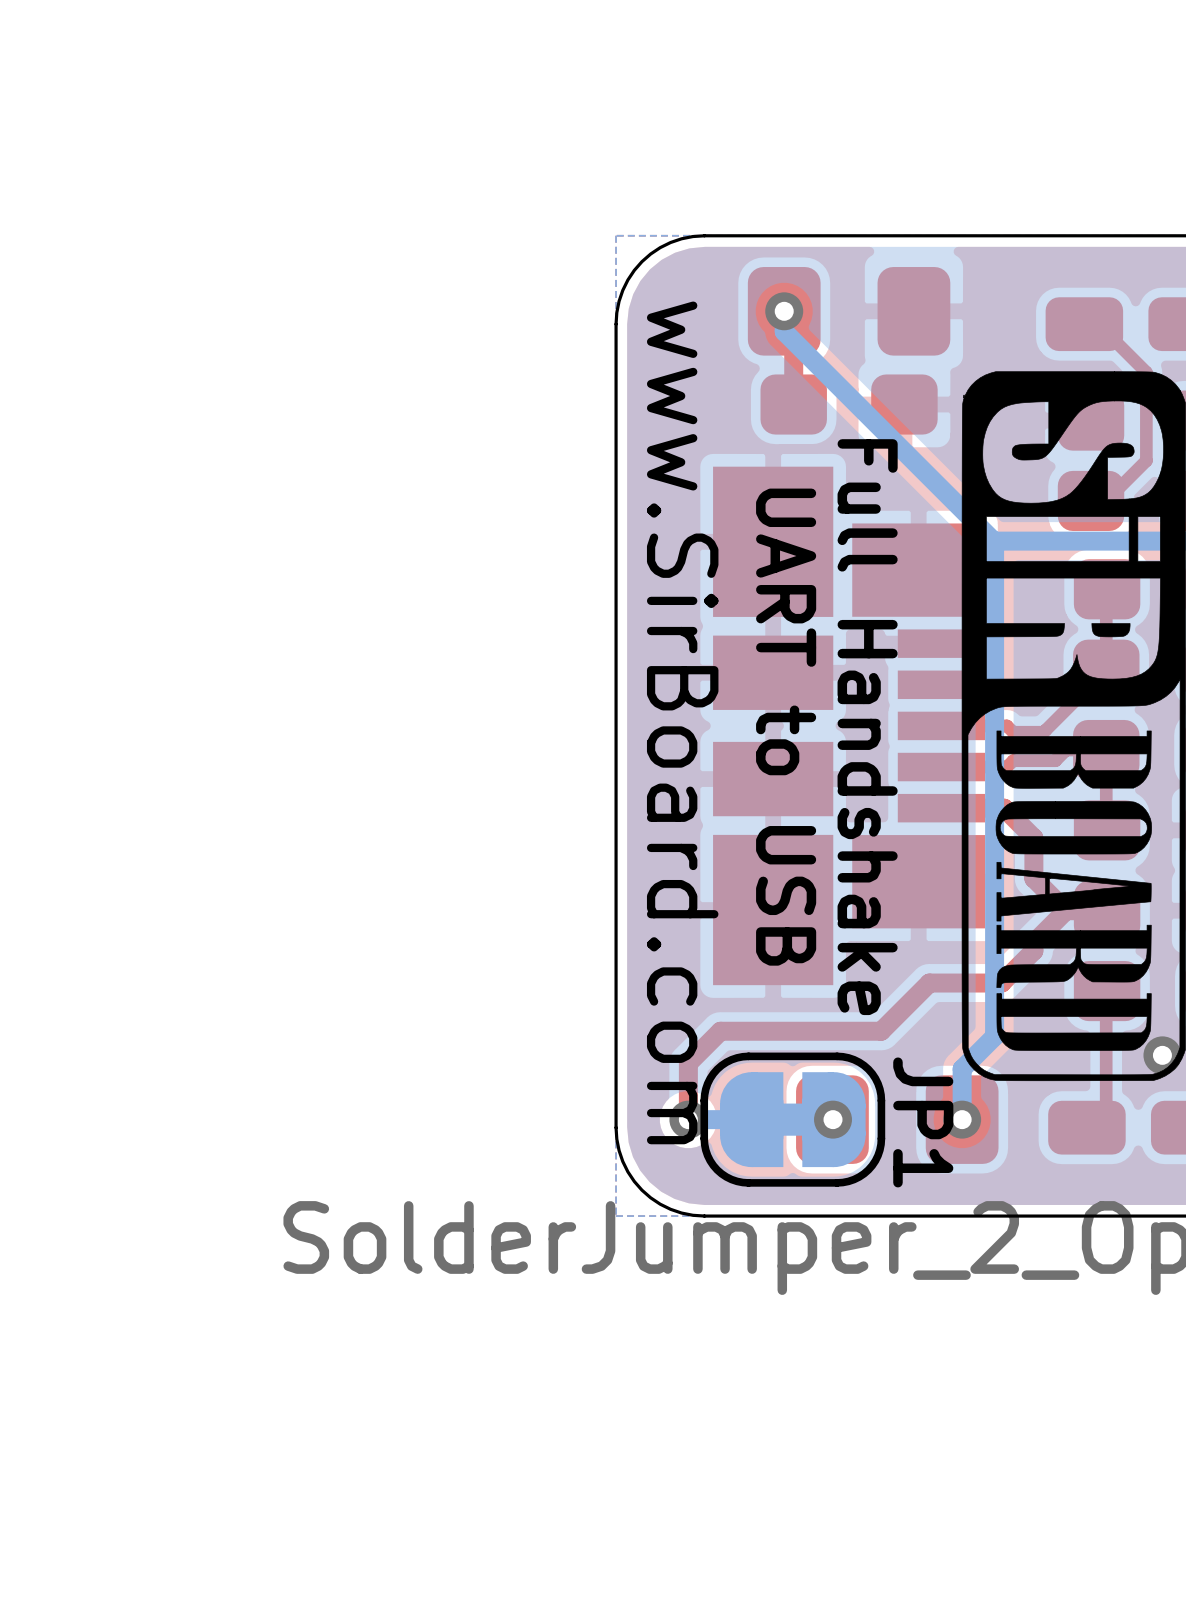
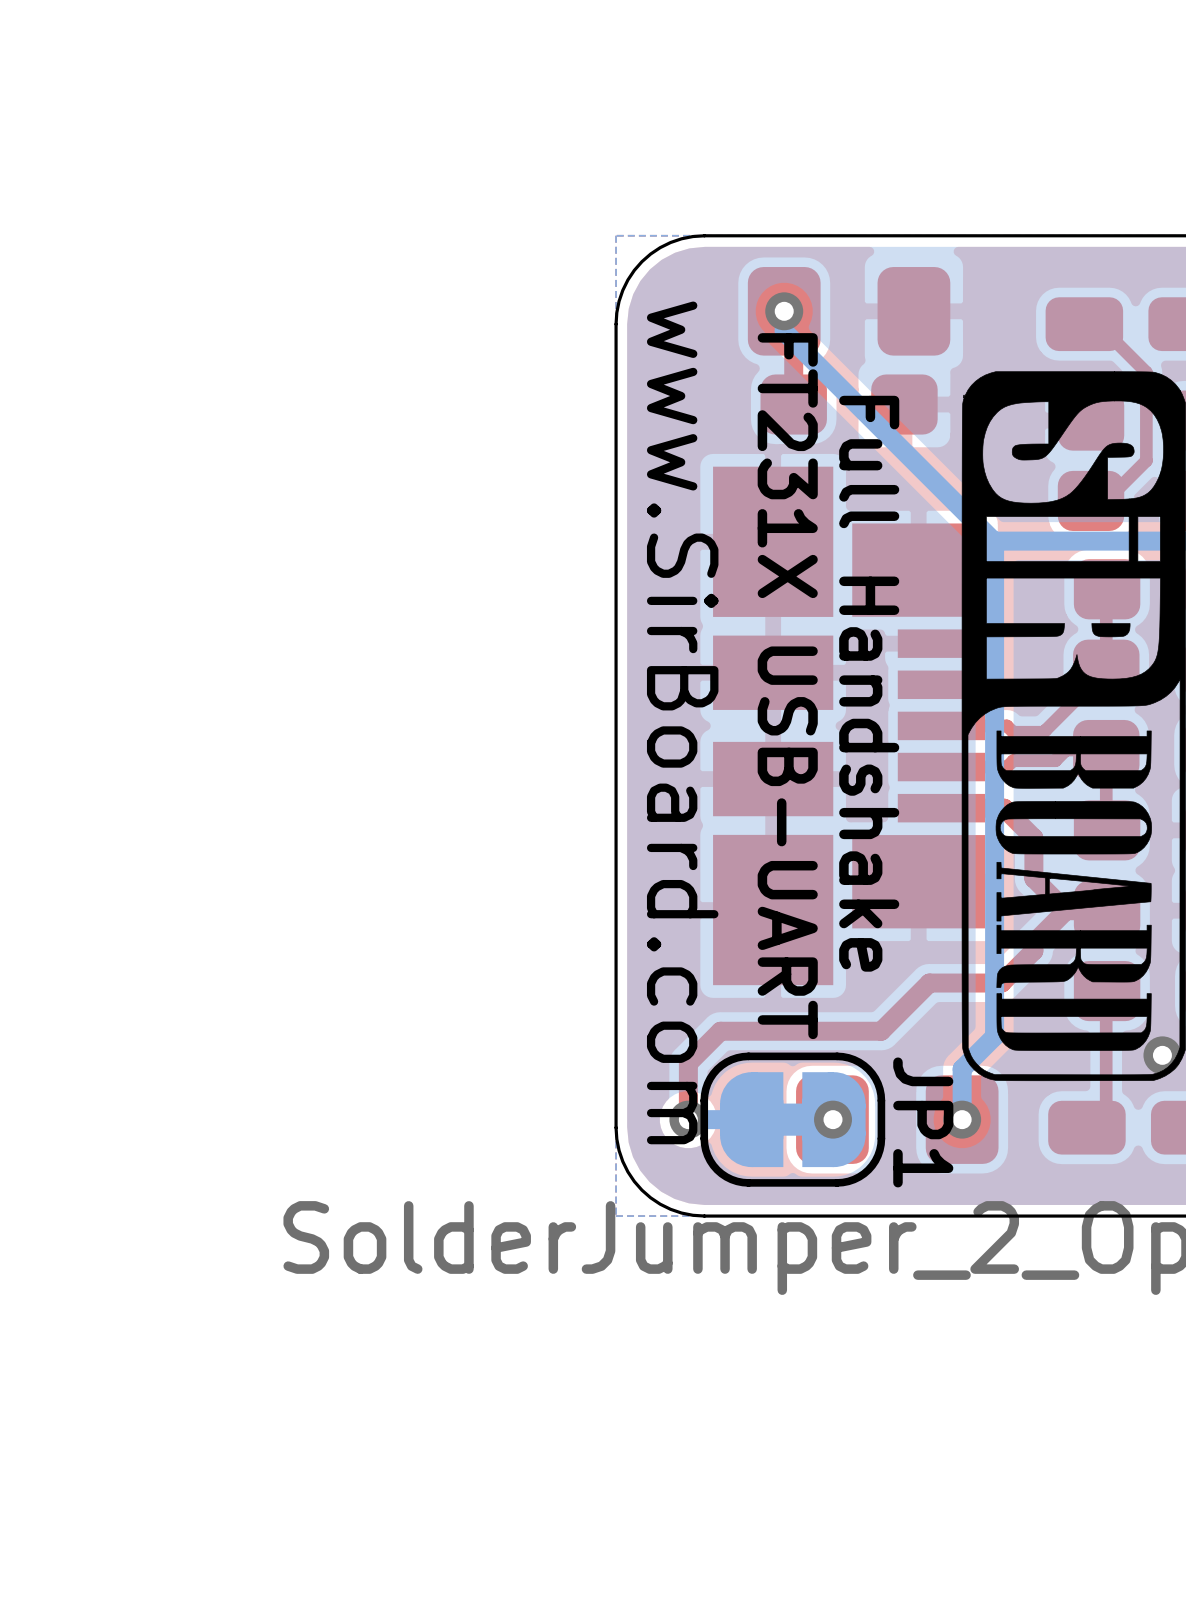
text: UART to USB (786, 727) -> FT231X USB-UART (787, 686)
text position: Full Handshake (867, 727) -> Full Handshake (869, 683)

